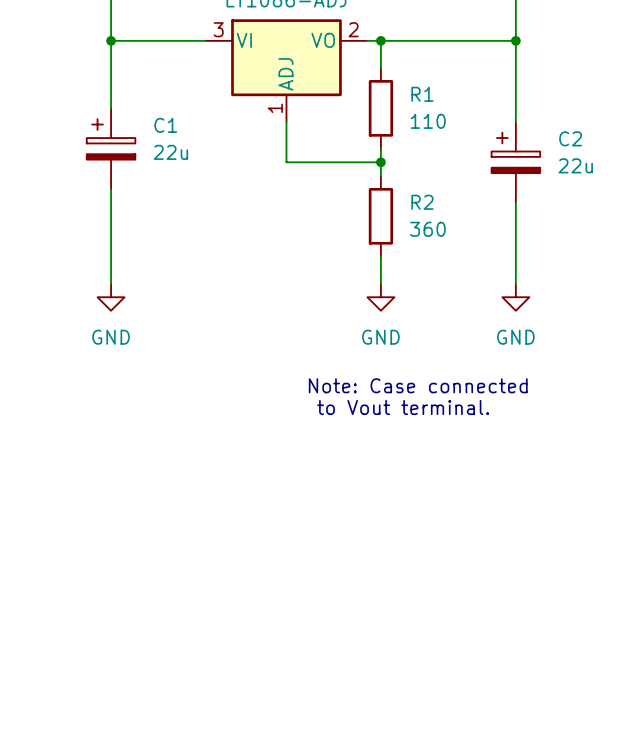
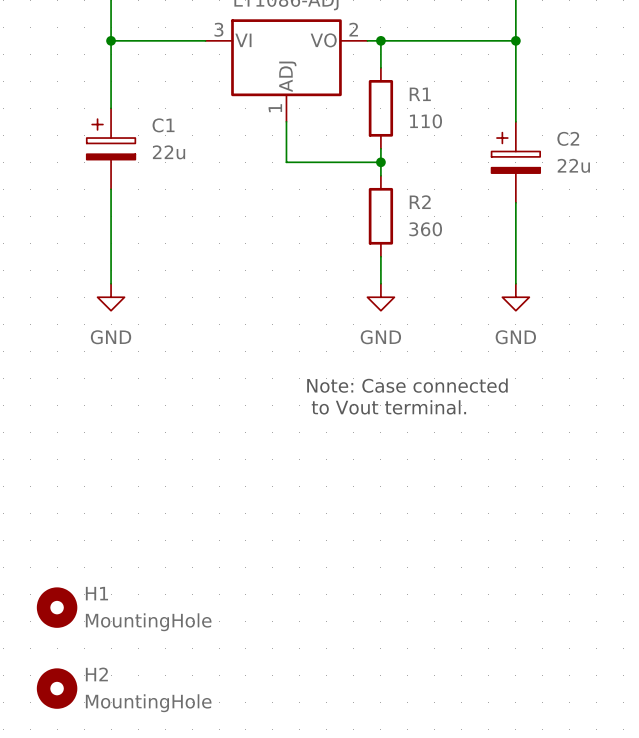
H1: none -> MountingHole (57, 607)
H2: none -> MountingHole (57, 688)

